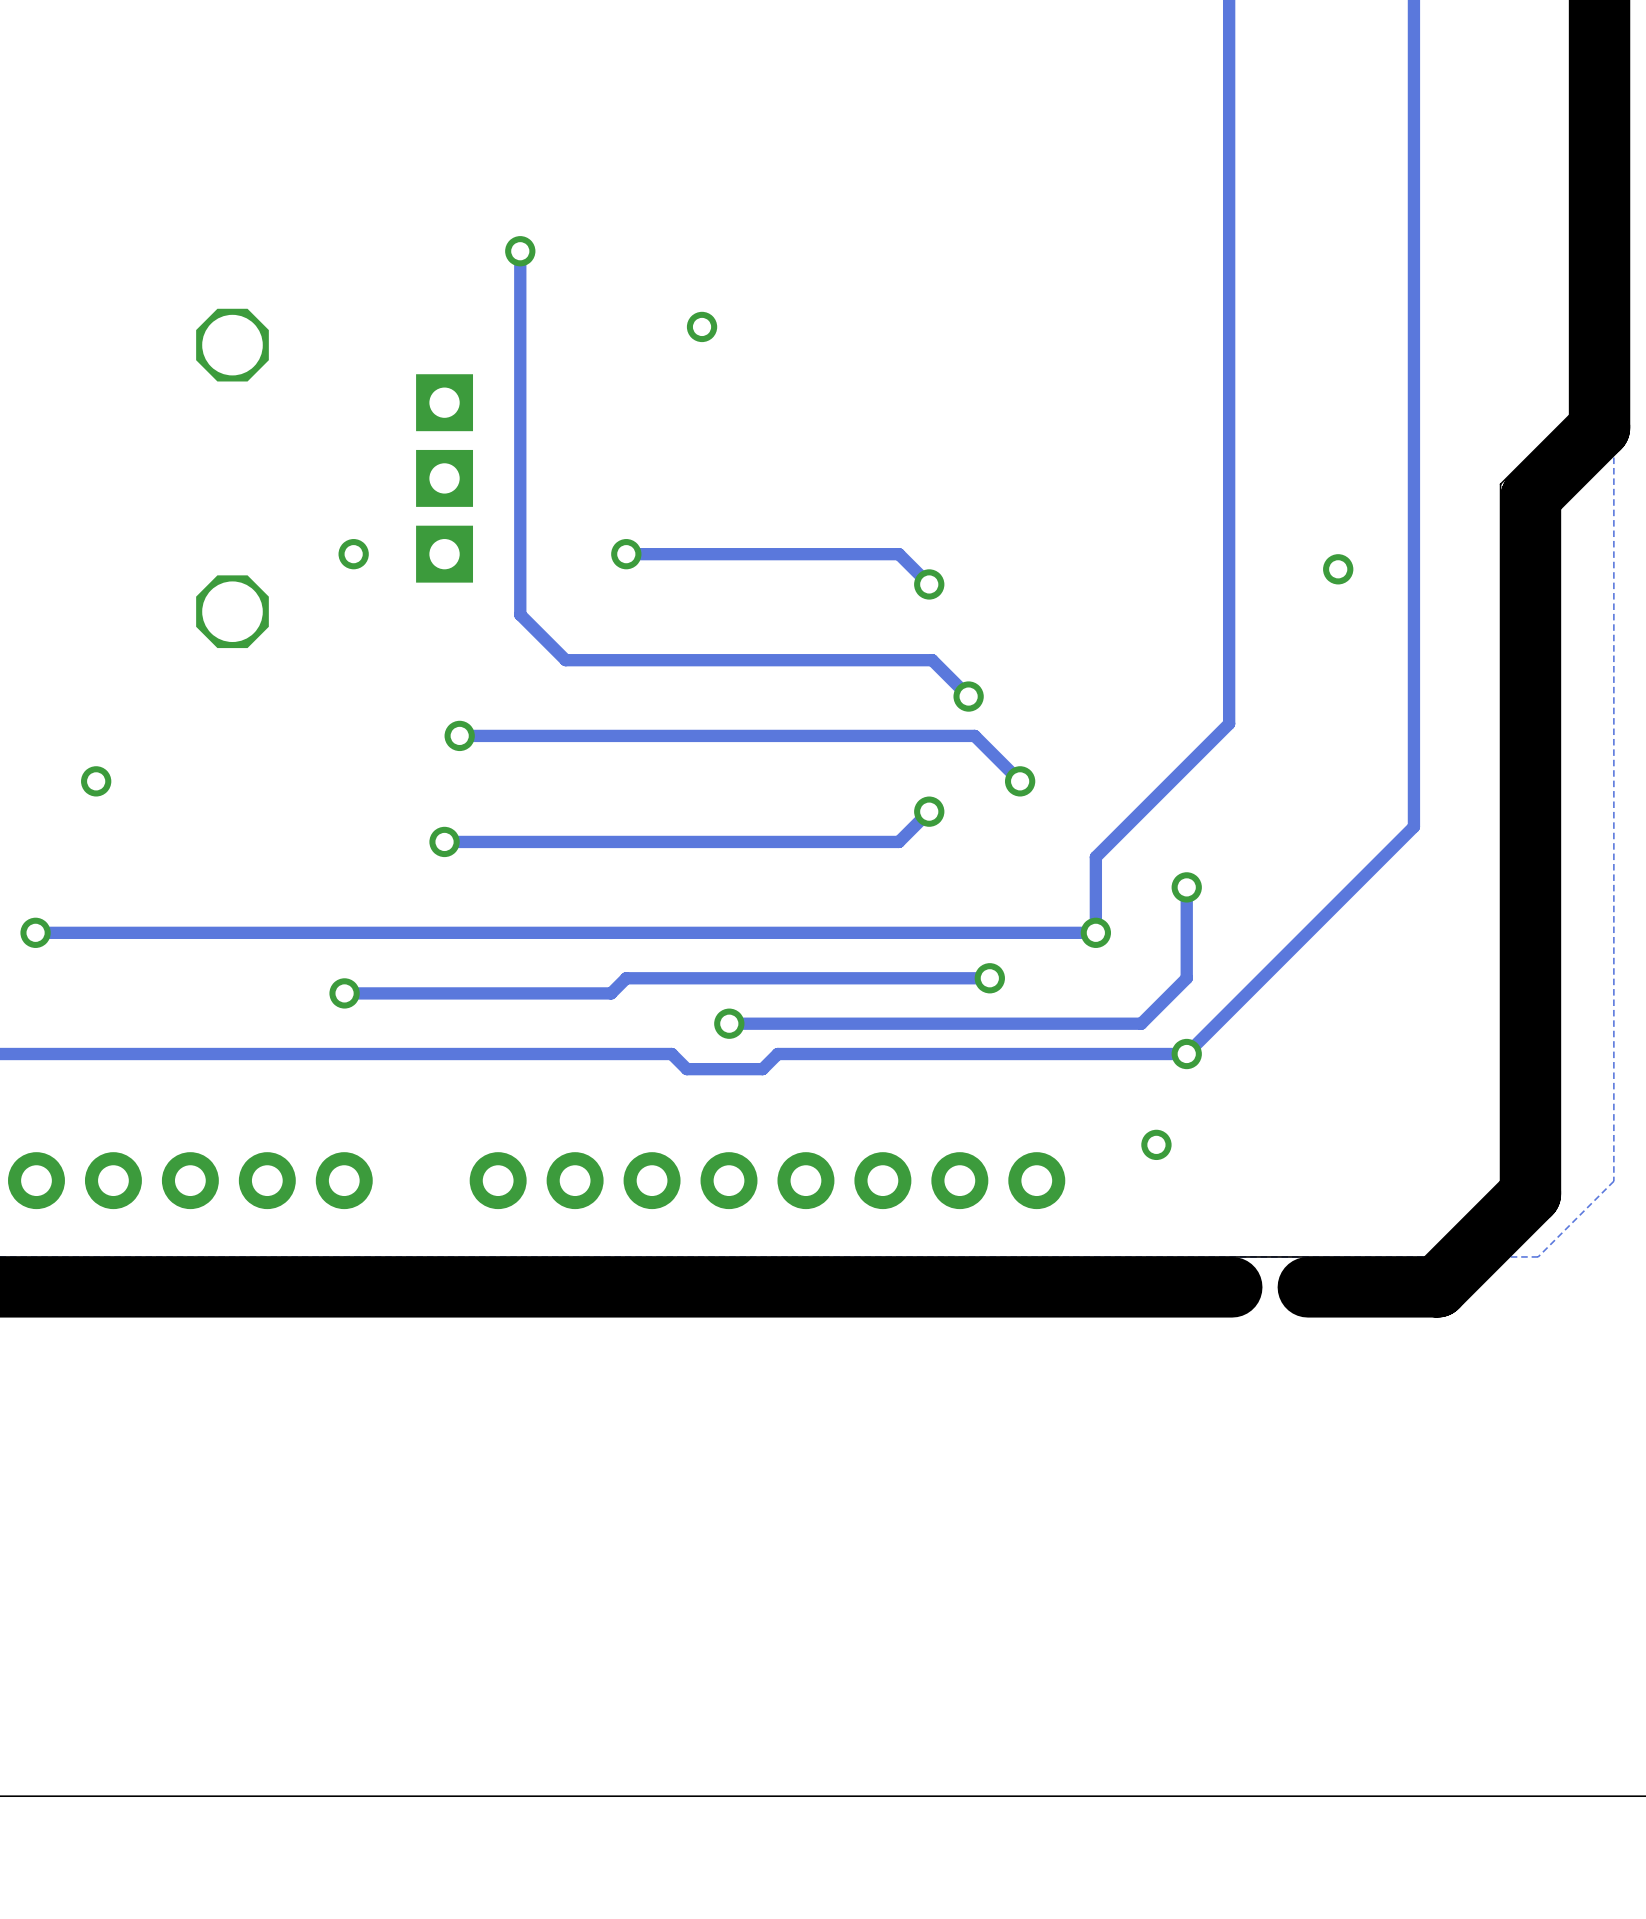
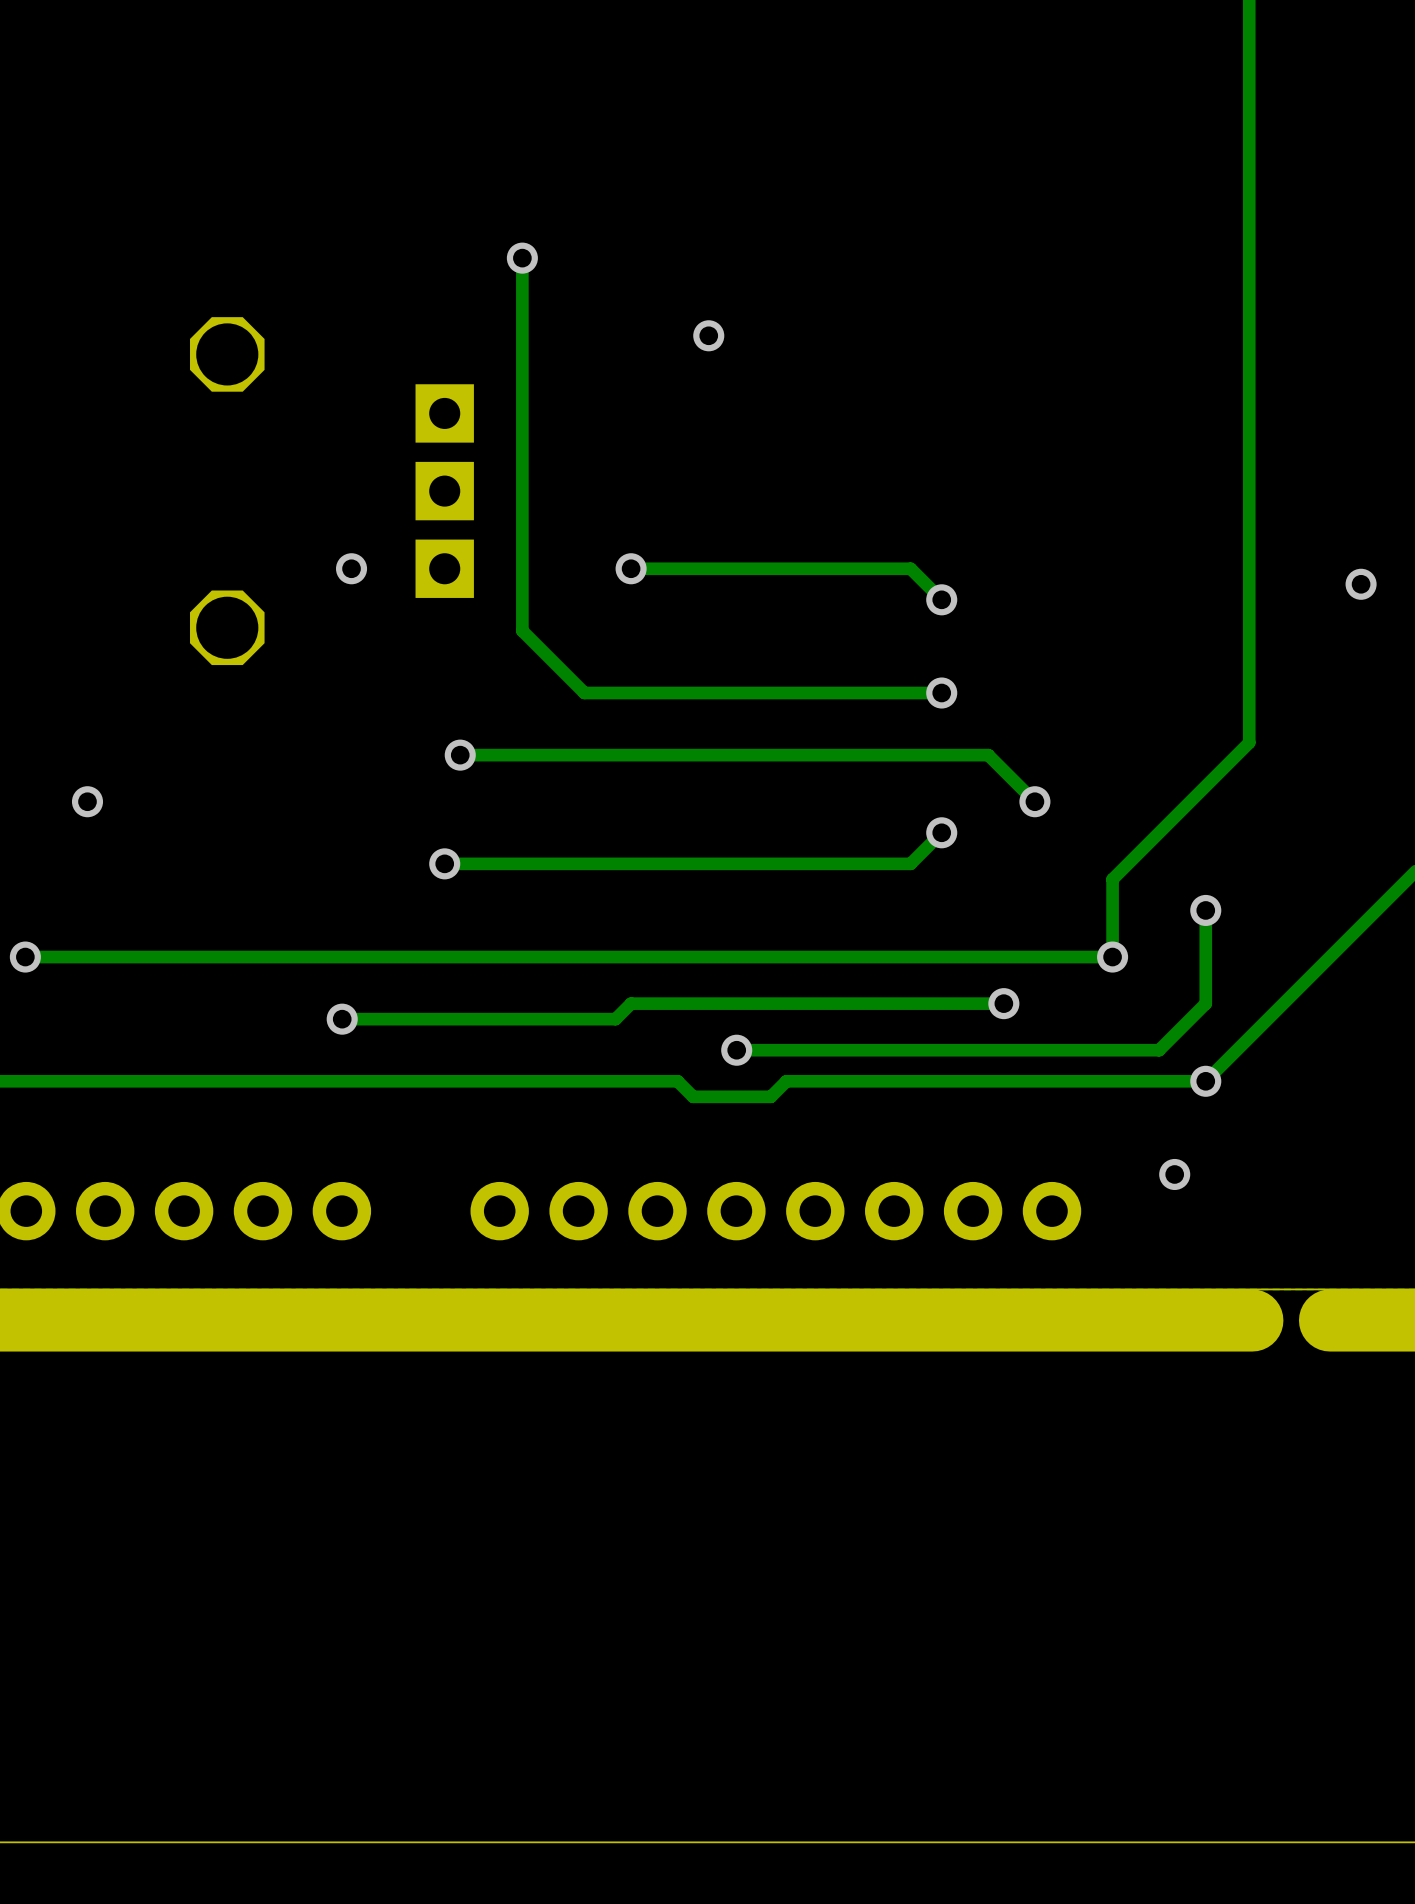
track: (565, 660) (932, 660) (968, 696) -> (568, 677) (584, 693) (941, 693)
via position: (968, 696) -> (941, 693)

